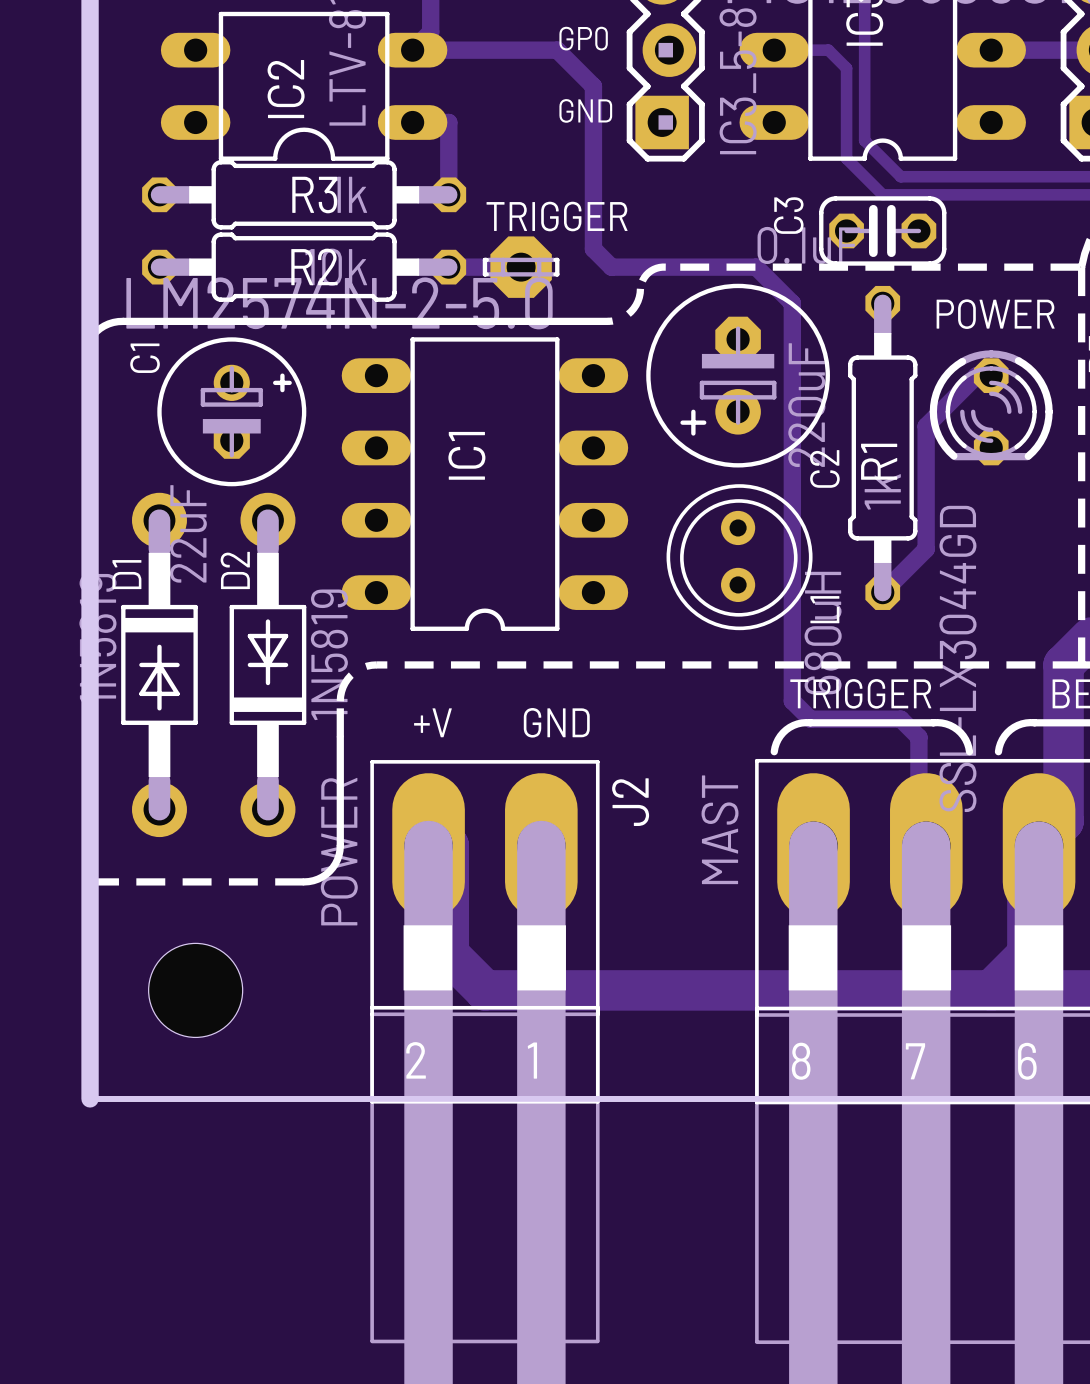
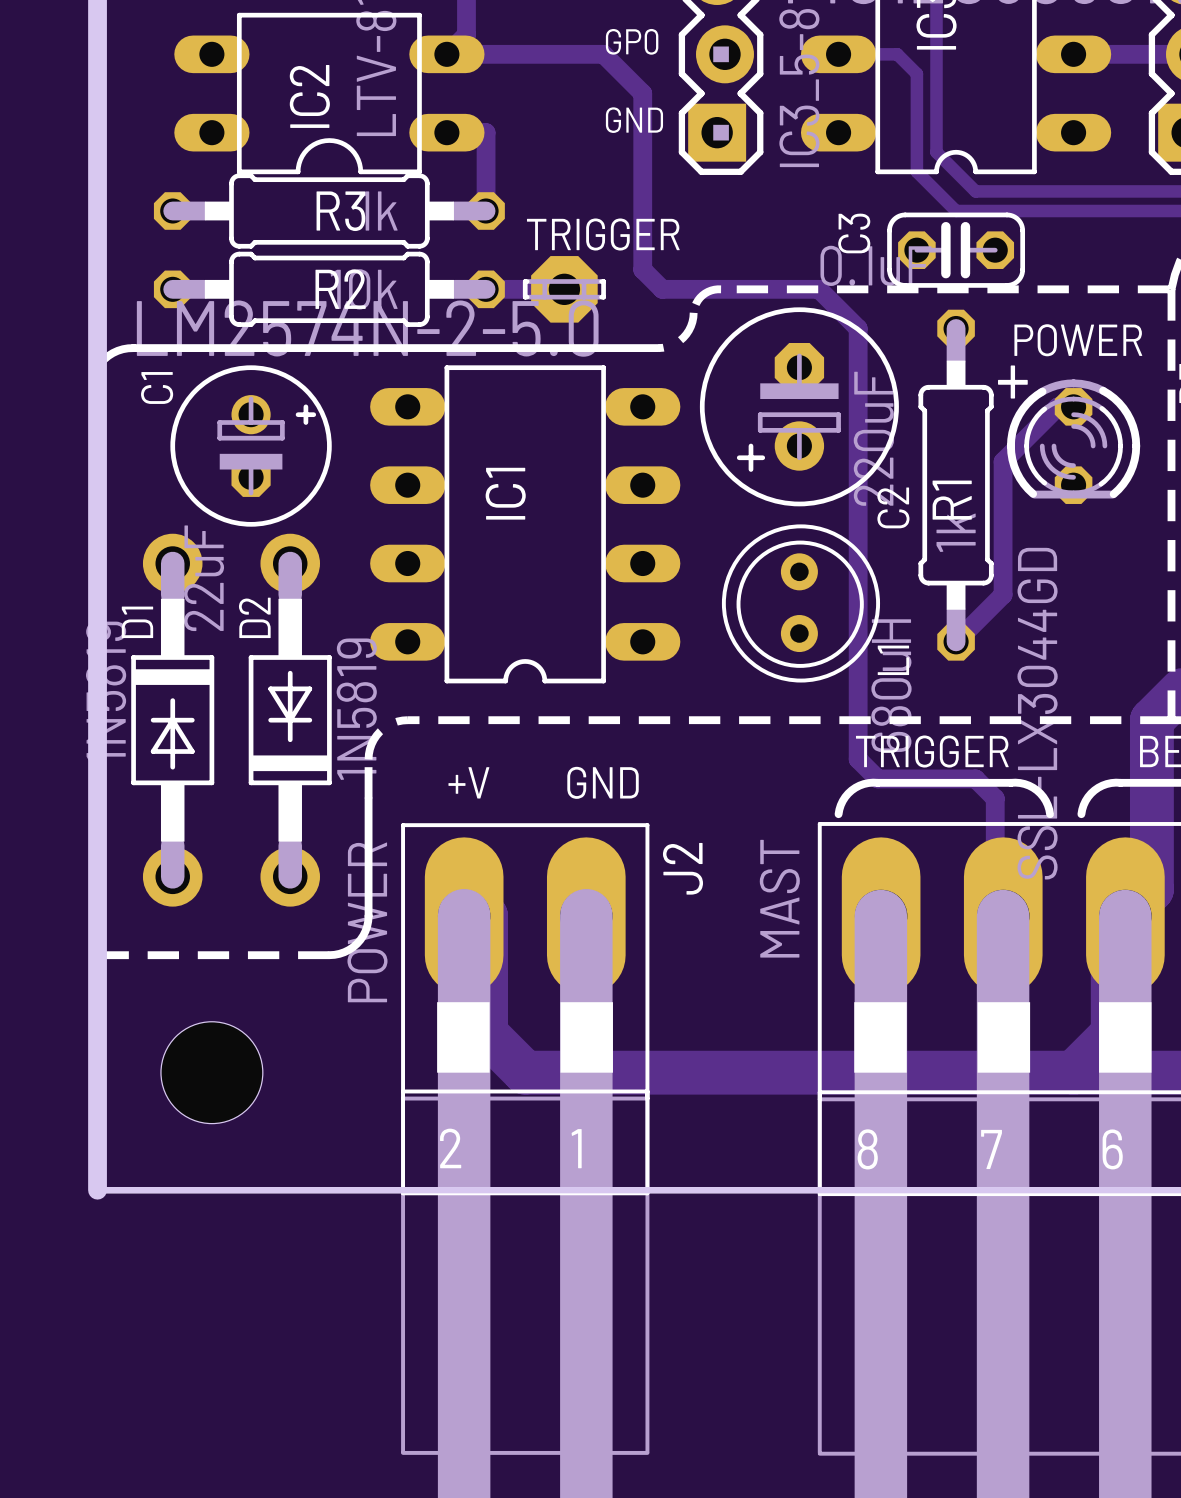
text: none -> + (1012, 382)

